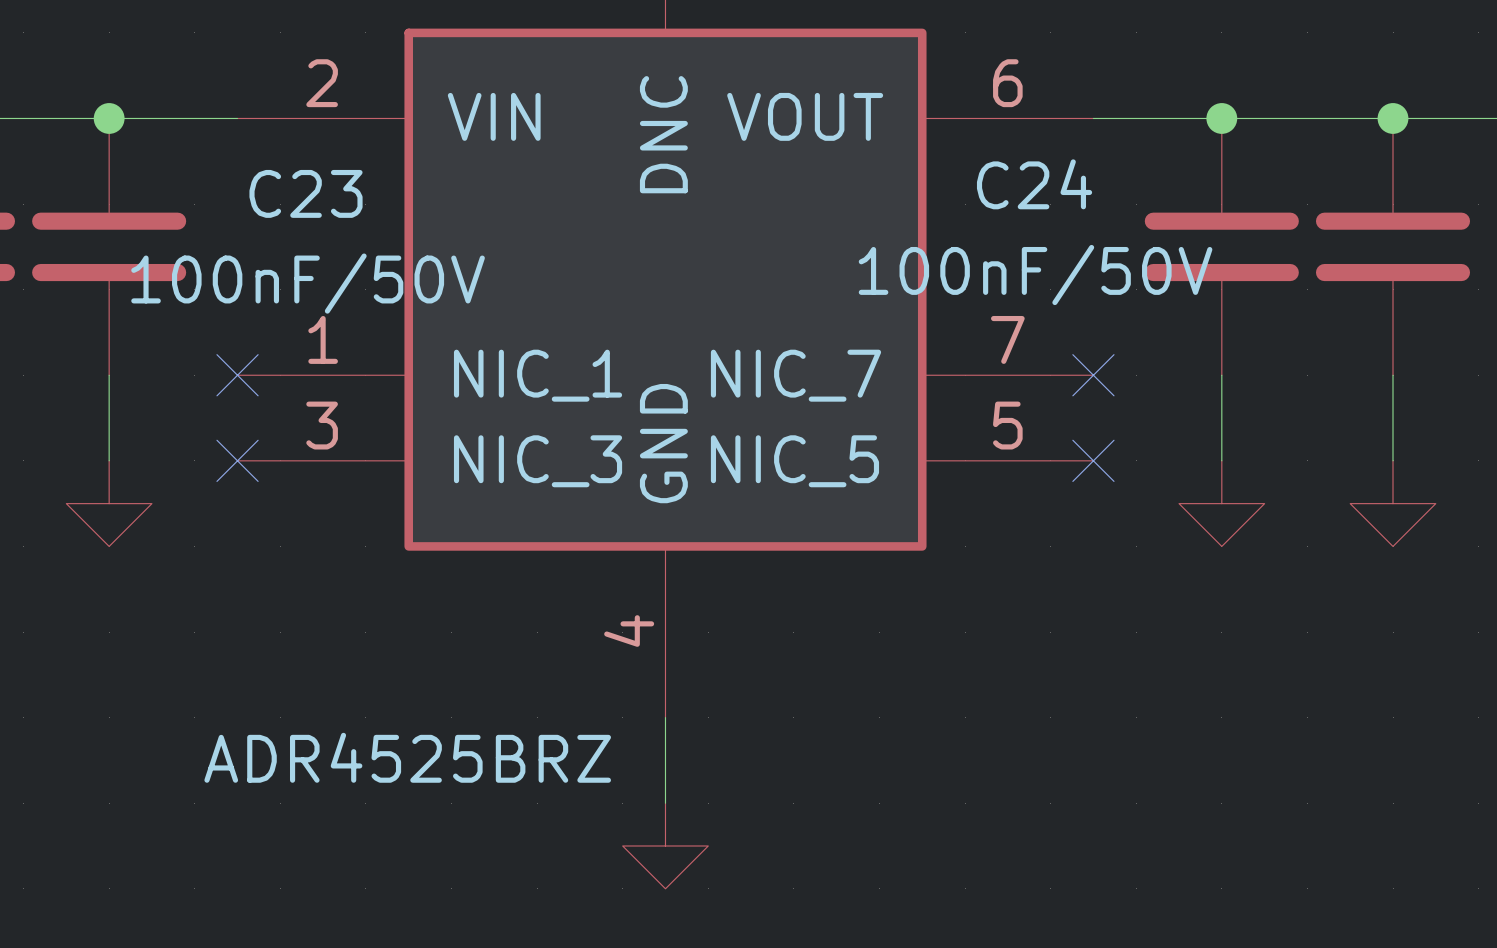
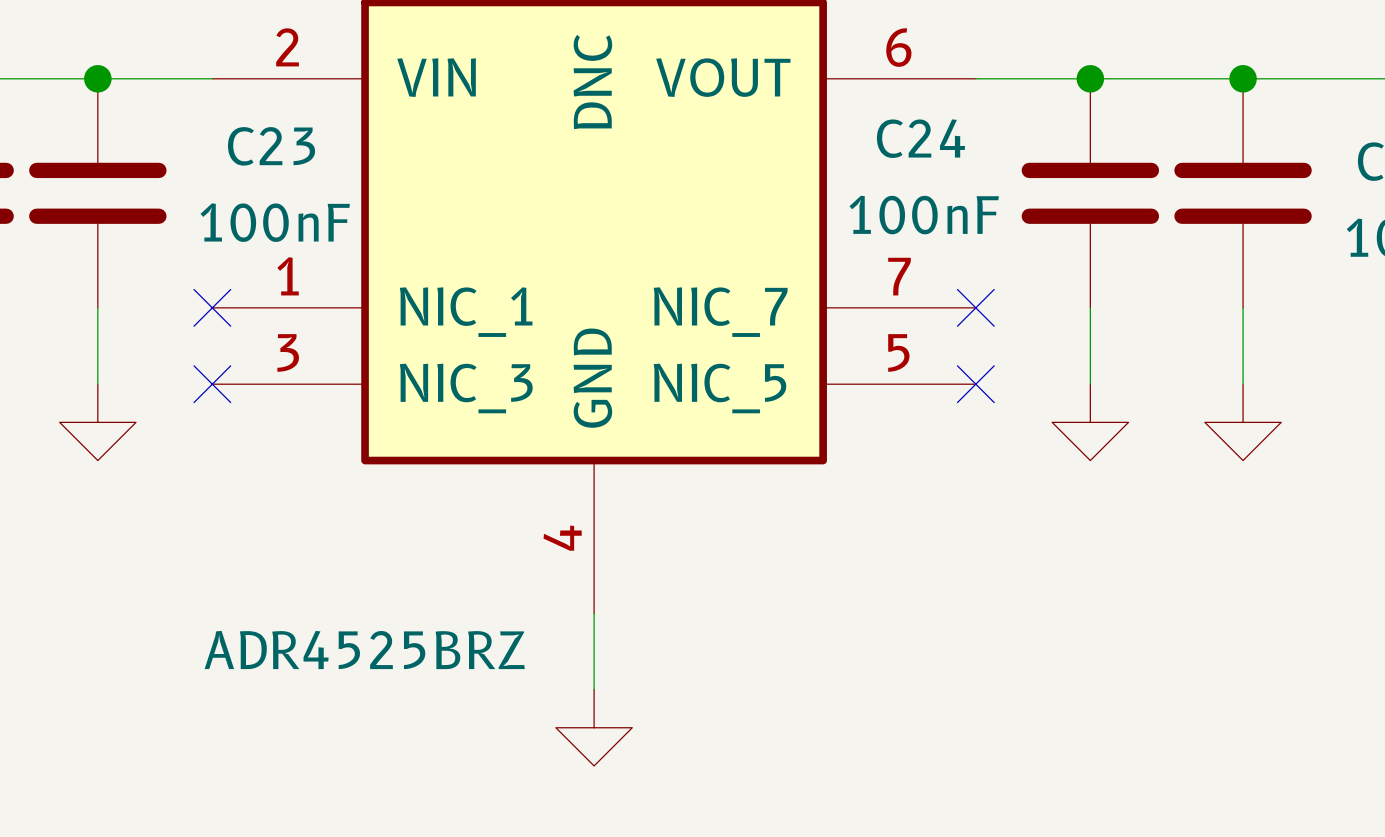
C24 value: 100nF/50V (1035, 275) -> 100nF (924, 215)
C23 value: 100nF/50V (308, 283) -> 100nF (275, 222)

